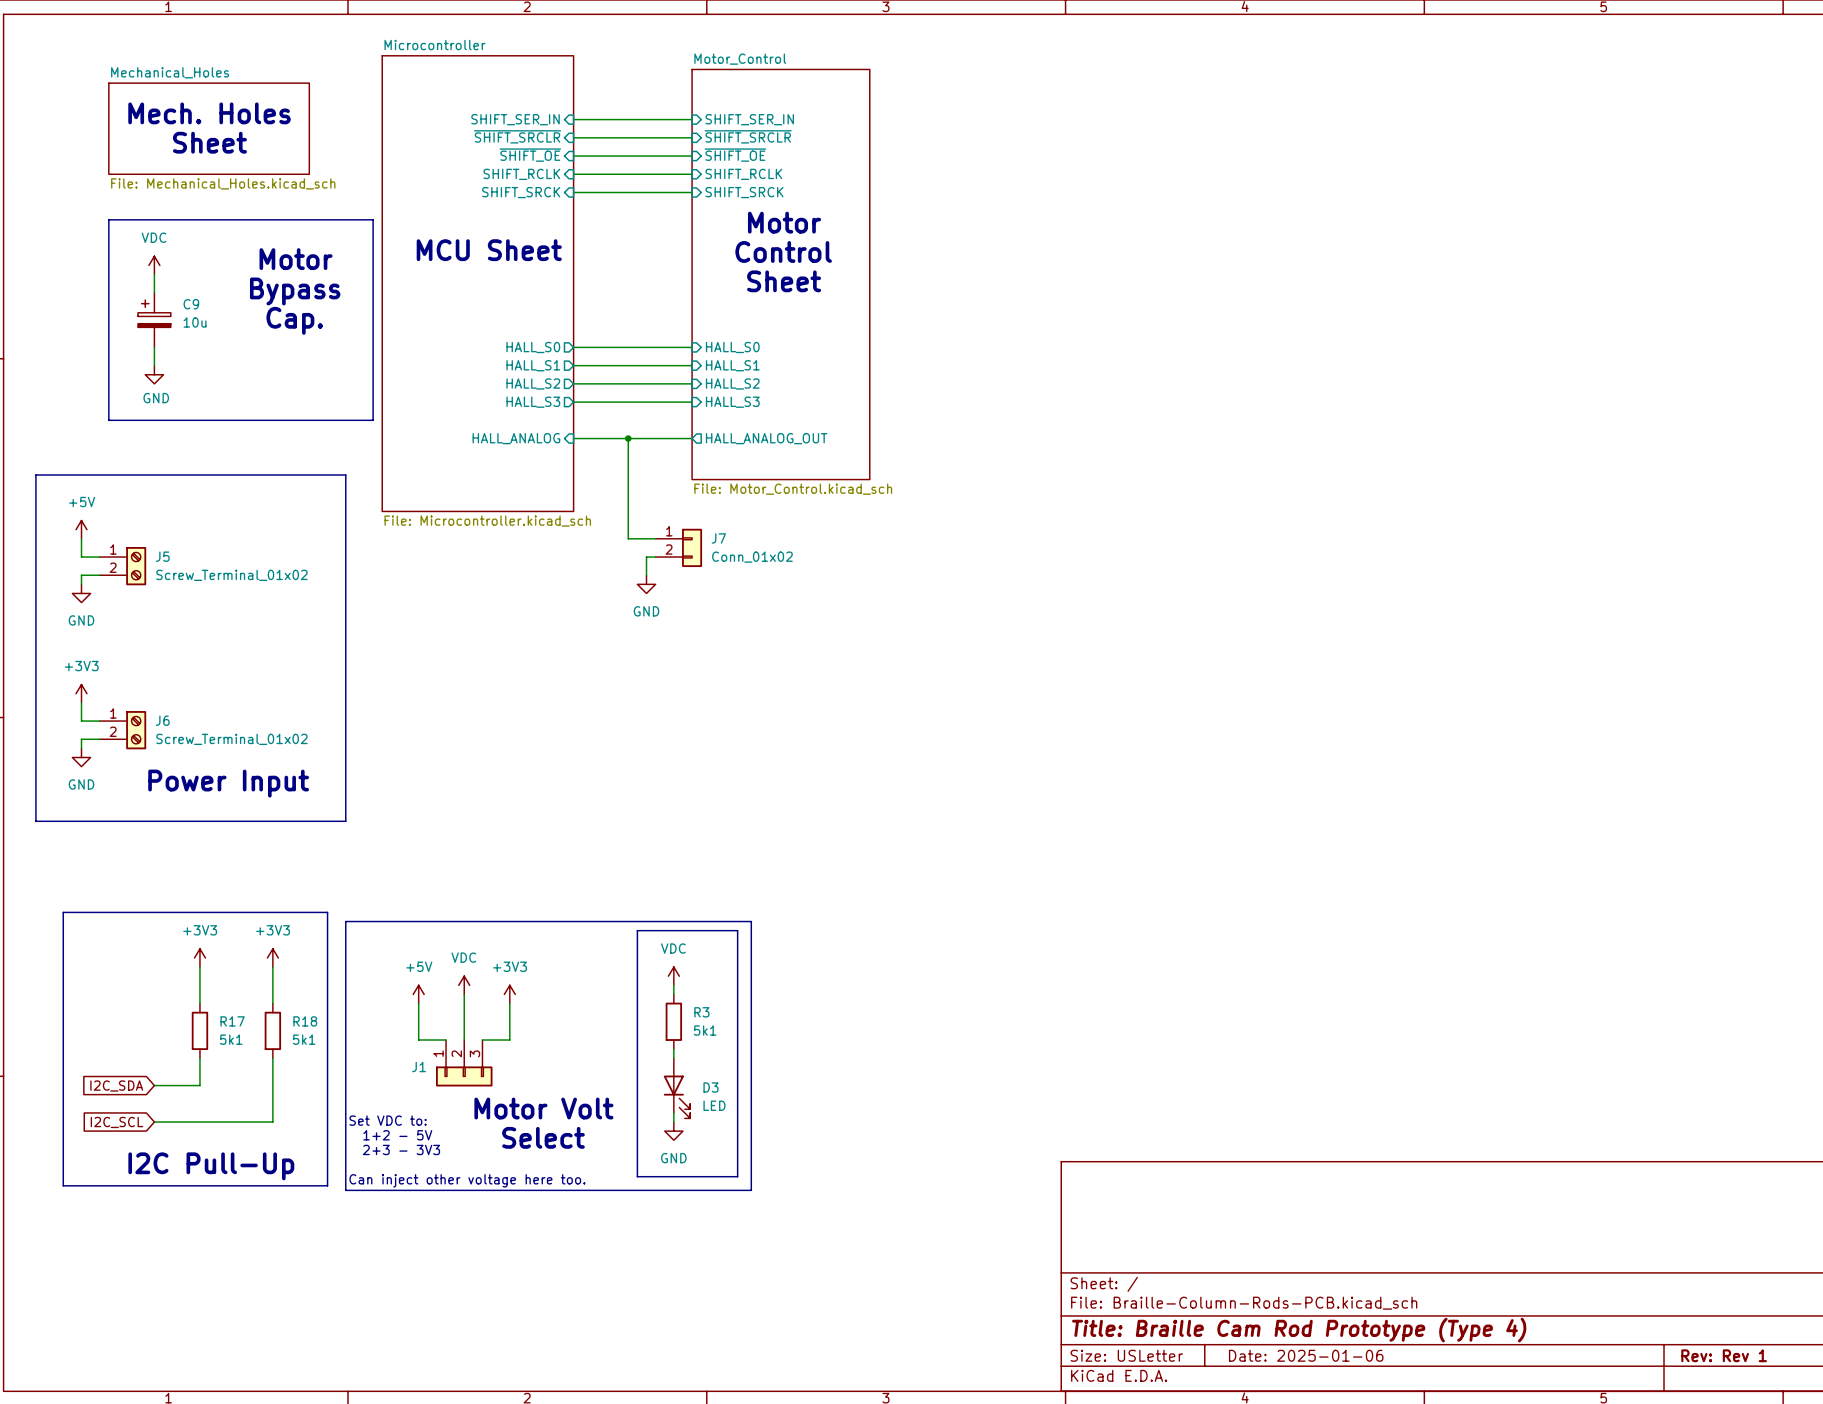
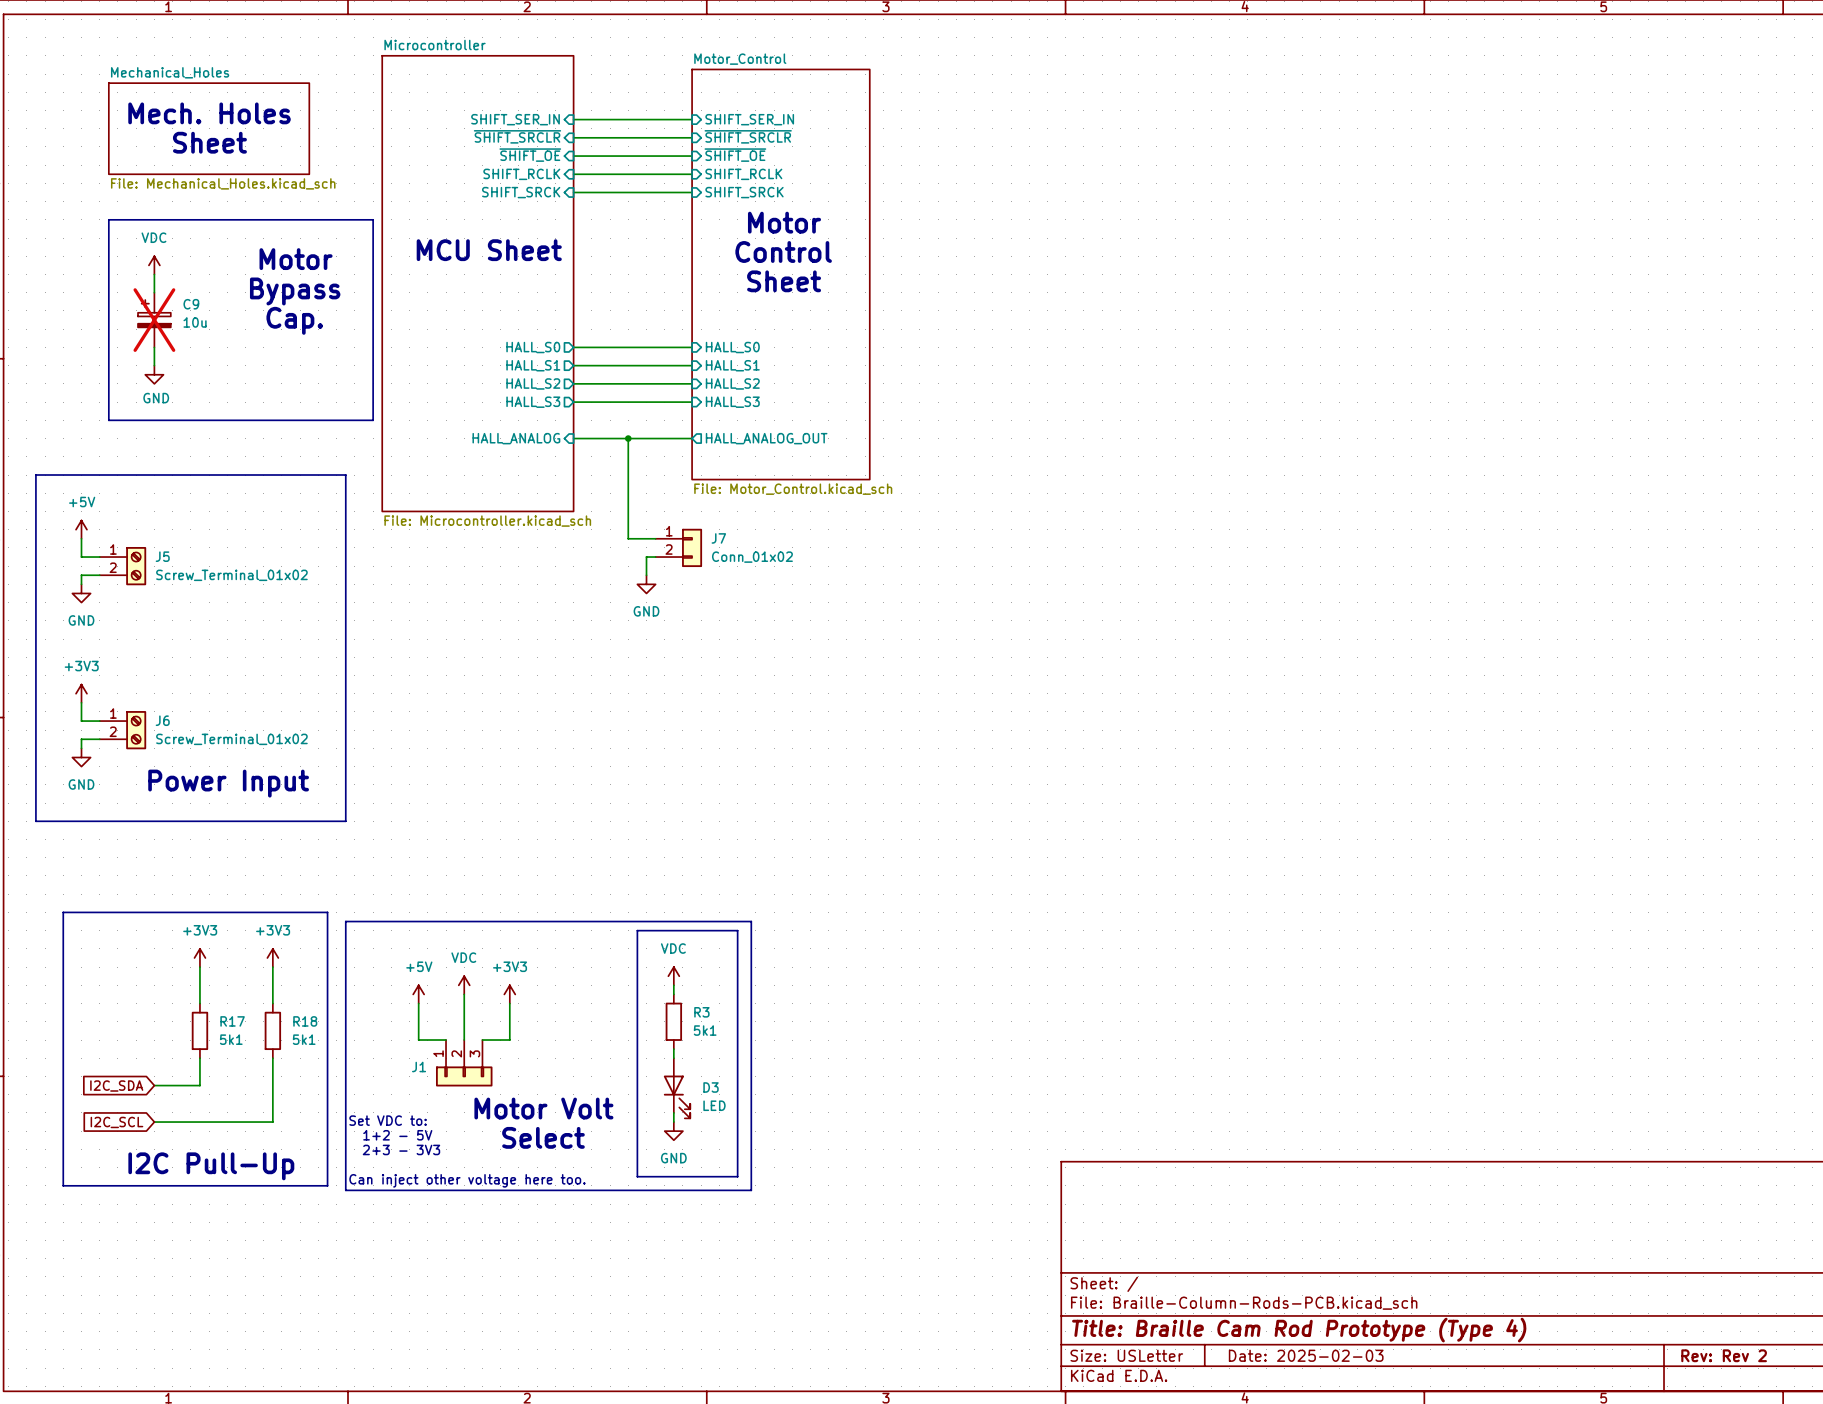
C9 do-not-place cross: none -> (154, 320)
title block: Date: 2025-01-06 (1306, 1355) -> Date: 2025-02-03 (1306, 1355)
title block: Rev: Rev 1 (1724, 1355) -> Rev: Rev 2 (1724, 1355)

